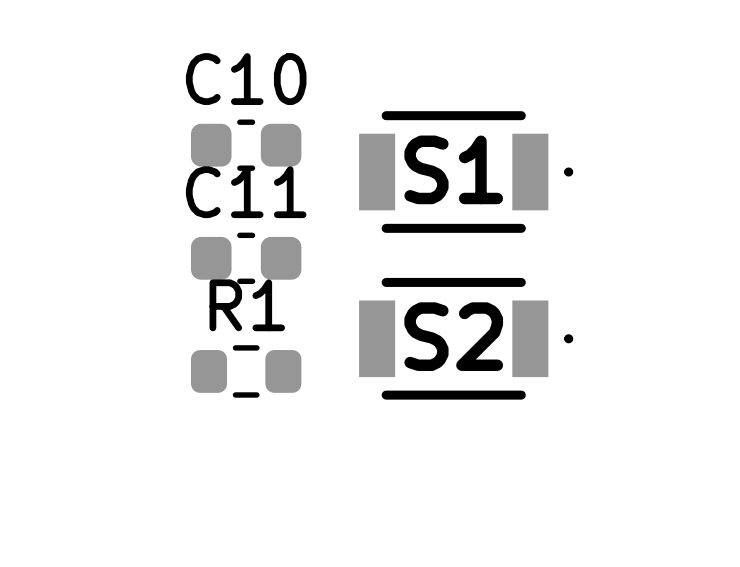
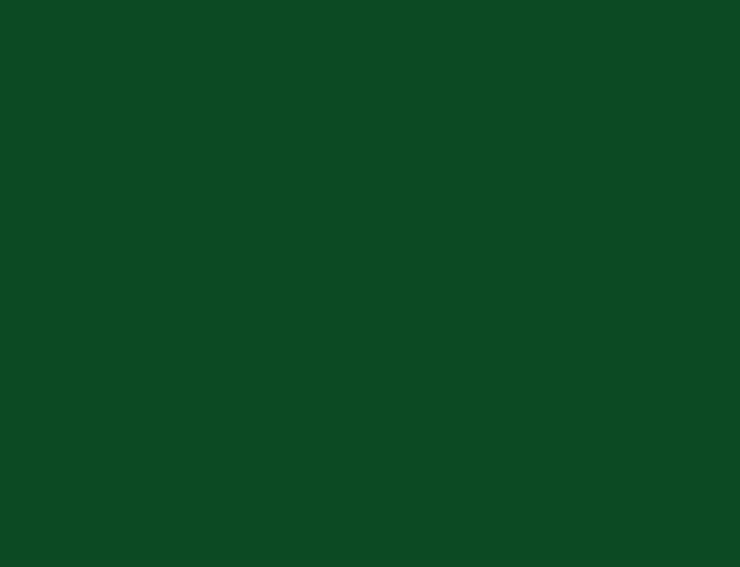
C10: (246, 145) -> none
S1: (466, 172) -> none
C11: (246, 258) -> none
S2: (466, 338) -> none
R1: (246, 371) -> none

